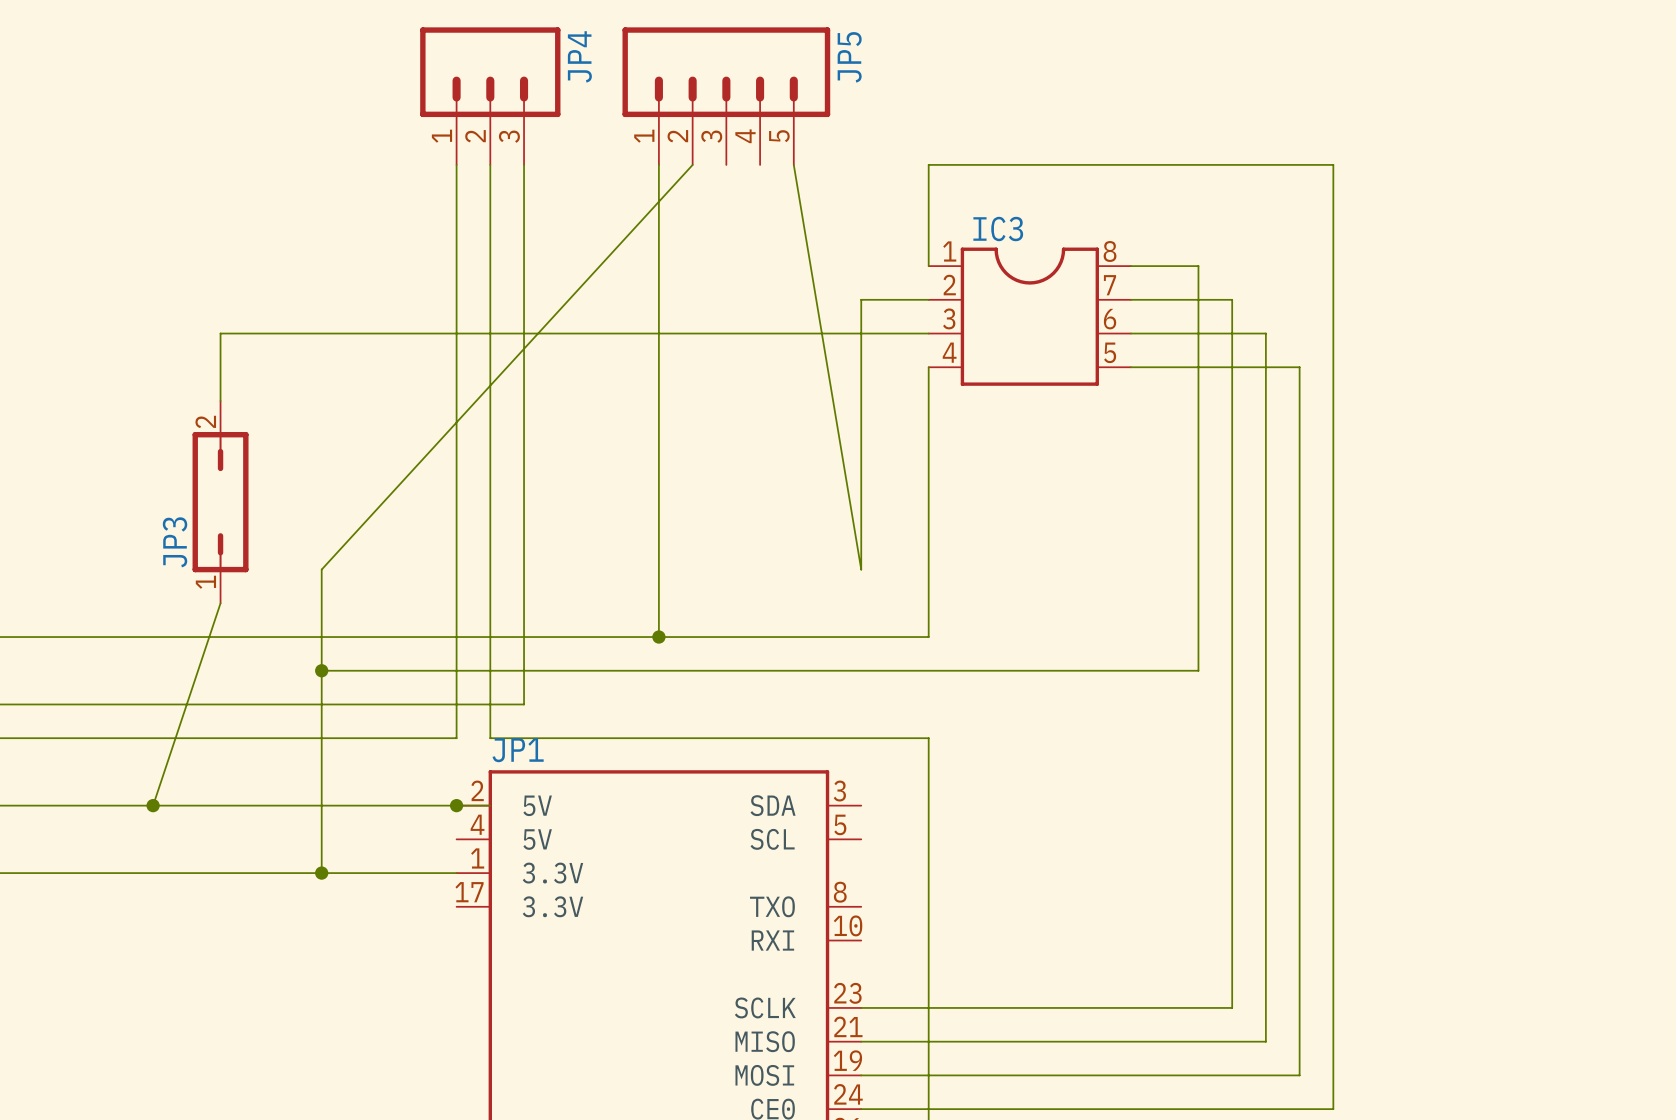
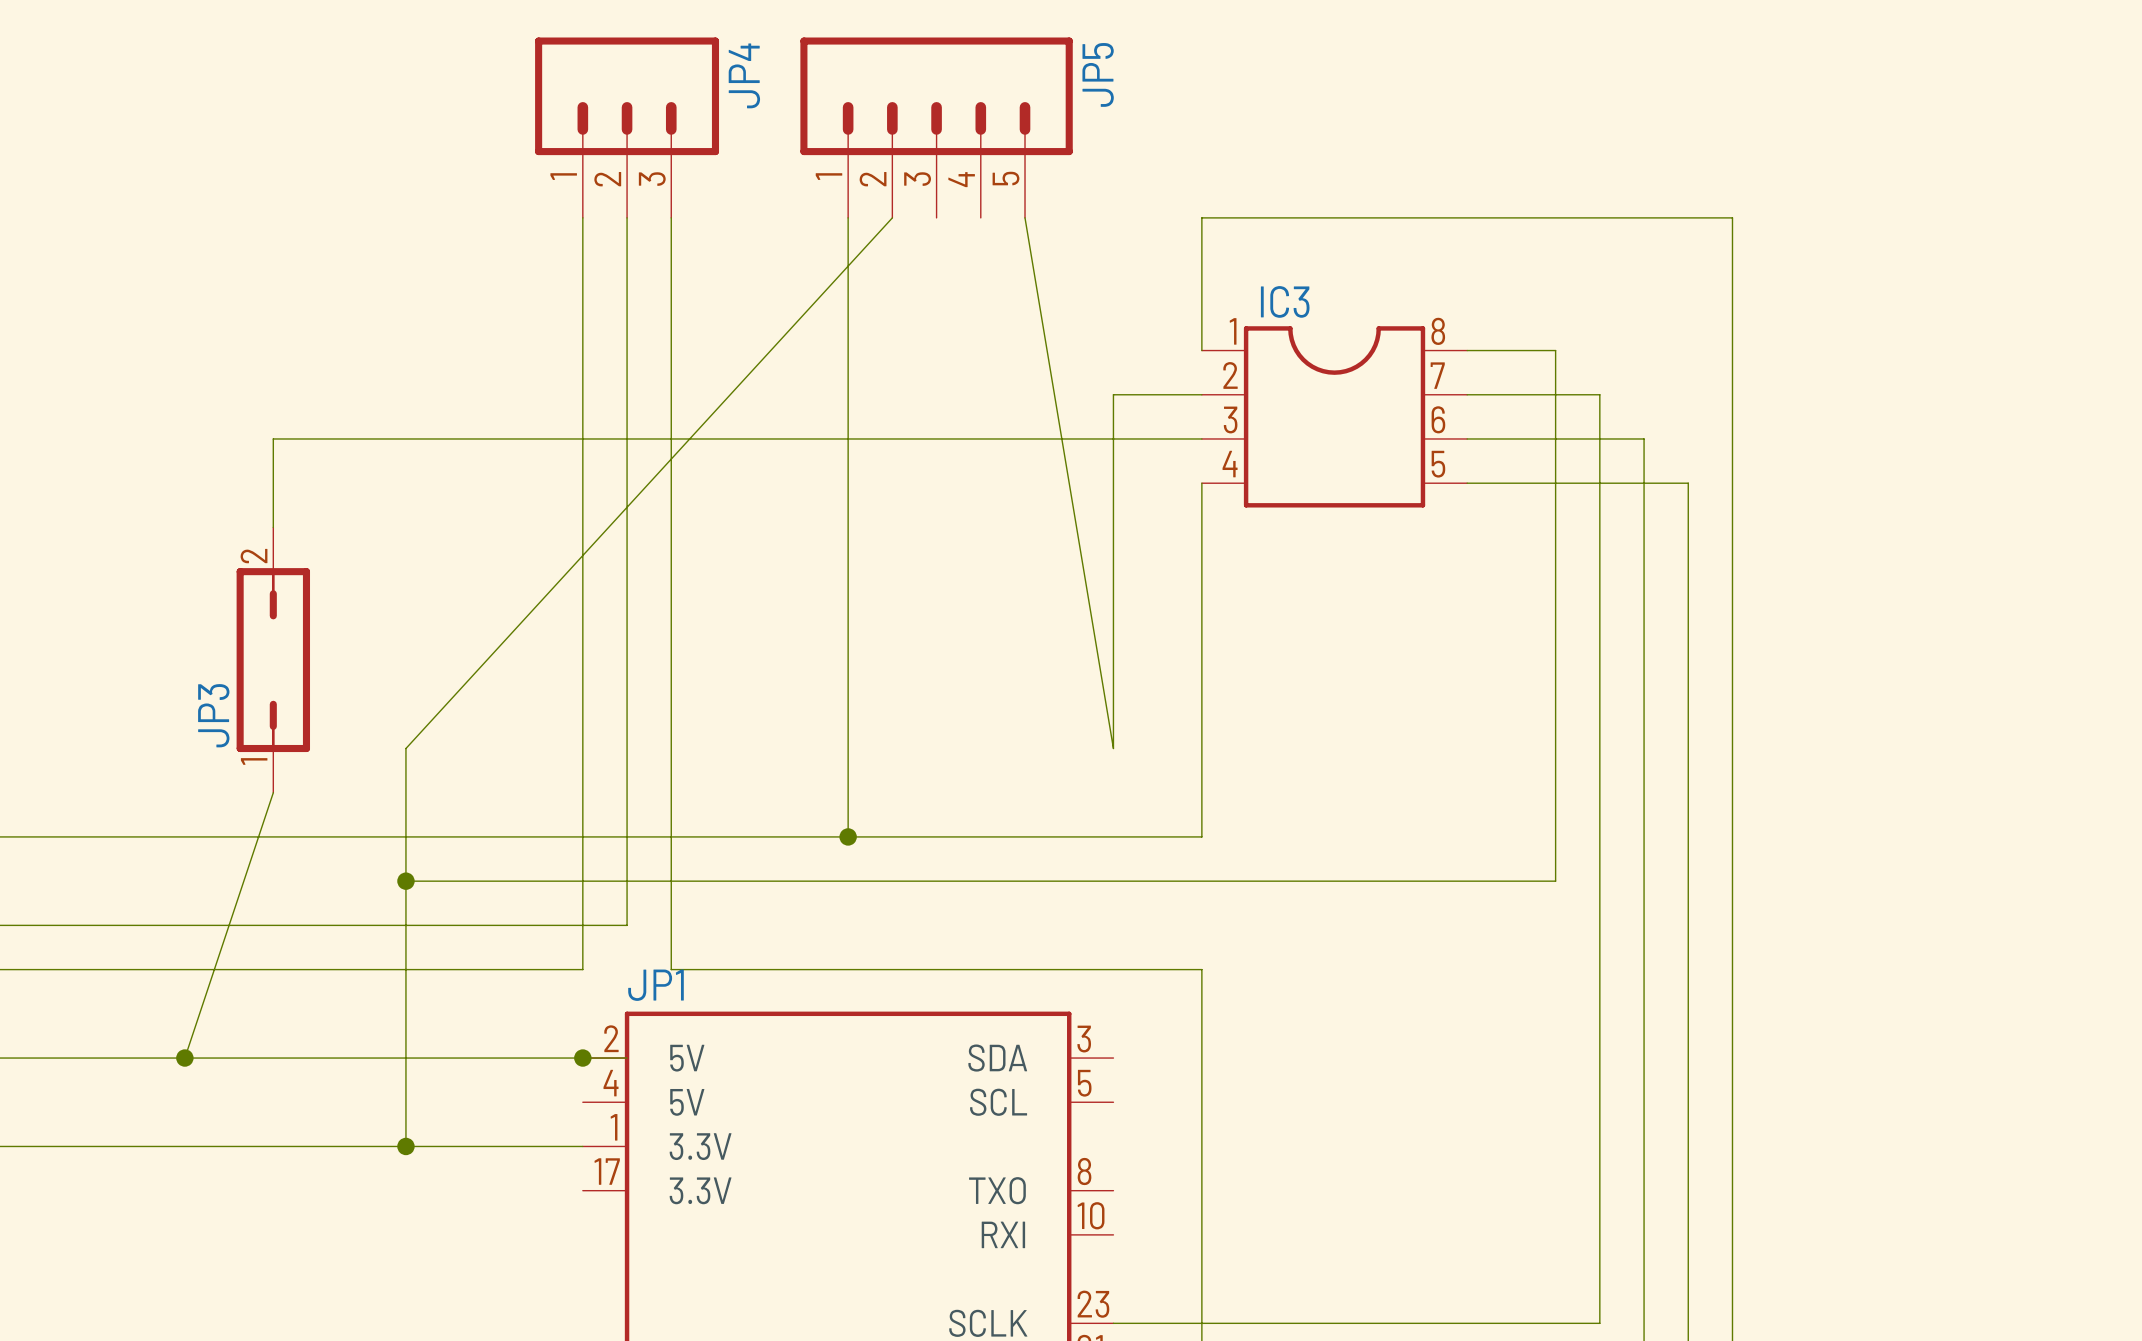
wire: (524, 704) (490, 704) (490, 738) (524, 738) -> (671, 925) (671, 969)

